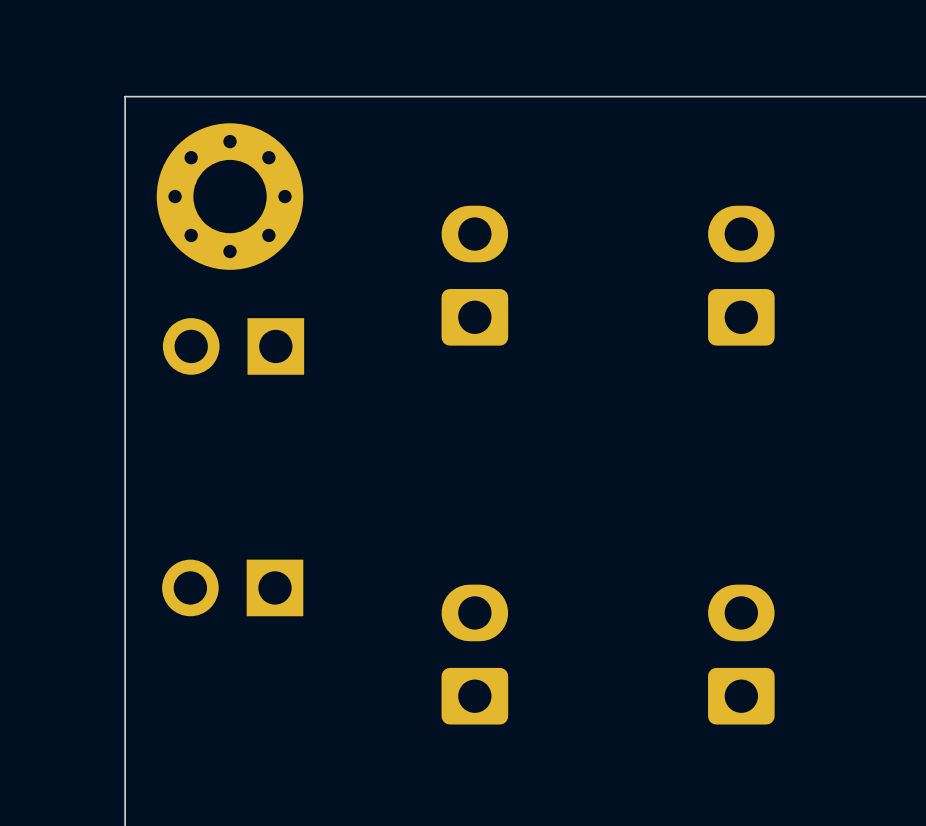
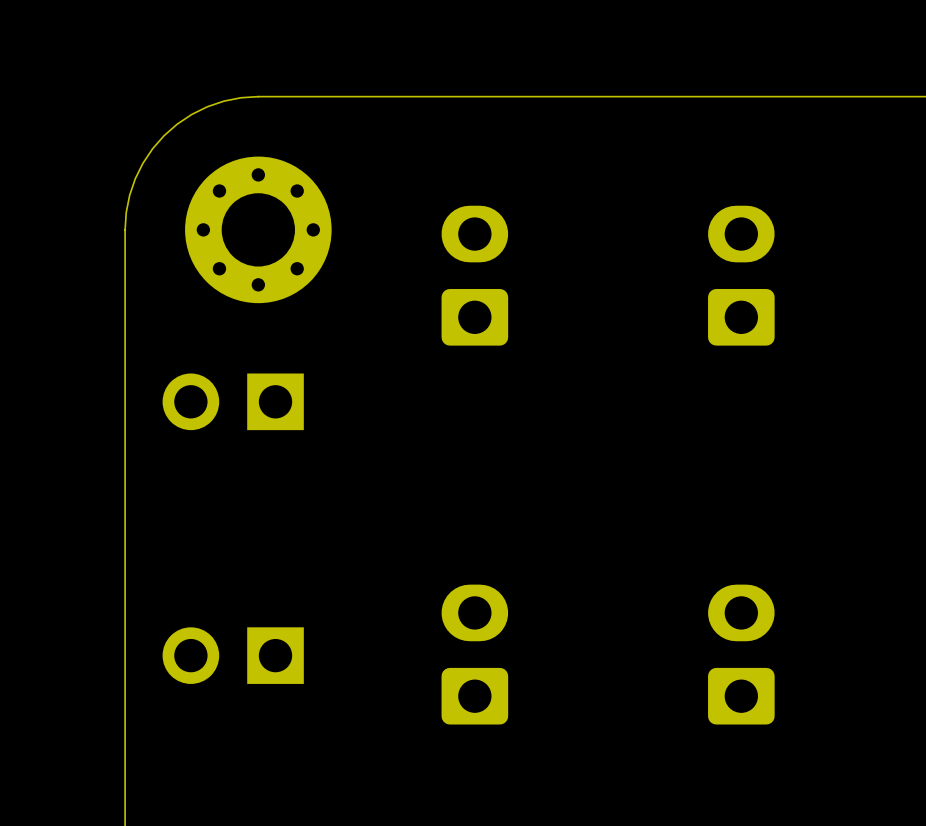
board edge: (258, 96) (125, 96) (125, 229) -> (258, 96) (240, 97) (207, 106) (191, 114) (164, 135) (152, 148) (135, 178) (129, 195) (125, 229)
part position: (230, 196) -> (258, 229)
part position: (233, 346) -> (233, 401)
part position: (232, 587) -> (233, 655)

